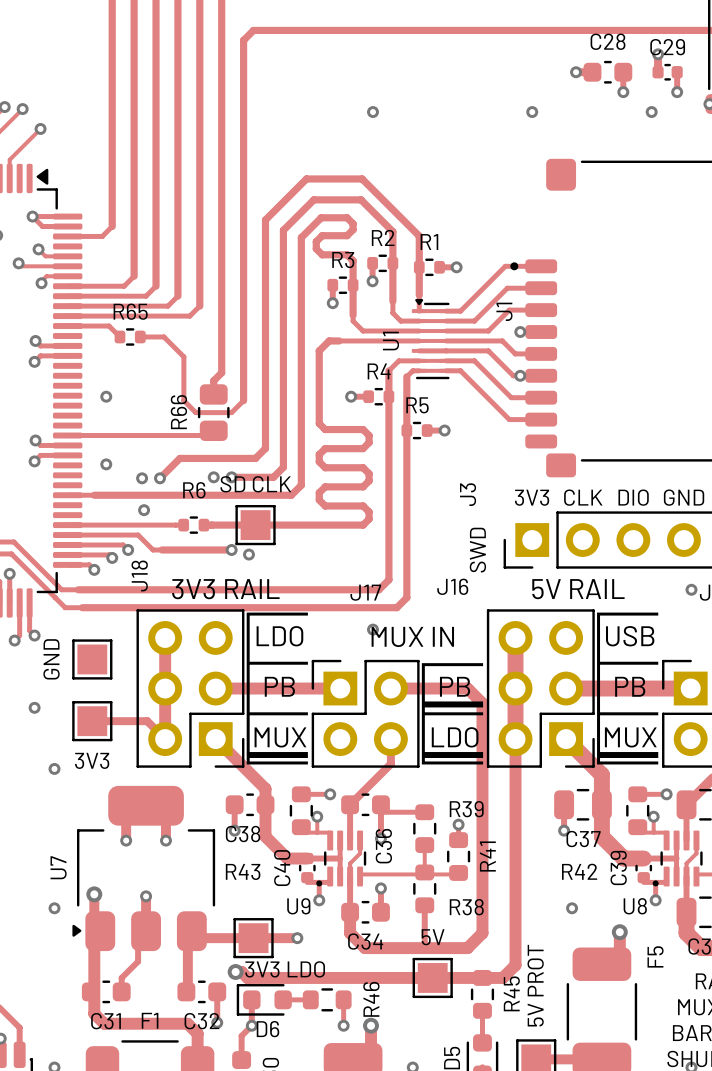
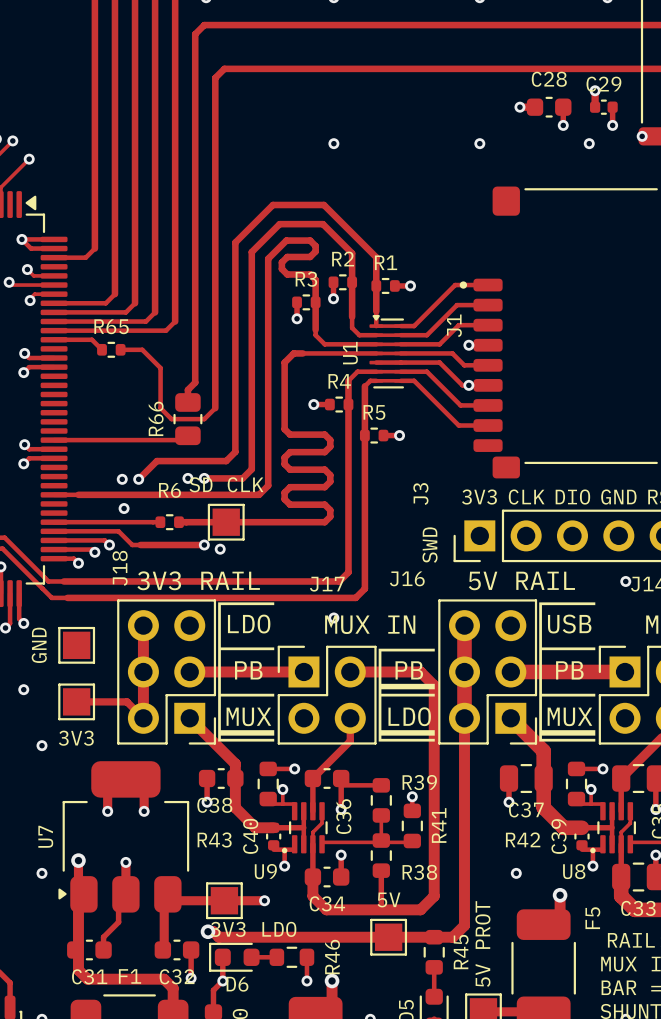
via: (106, 396) -> none
via: (106, 464) -> none

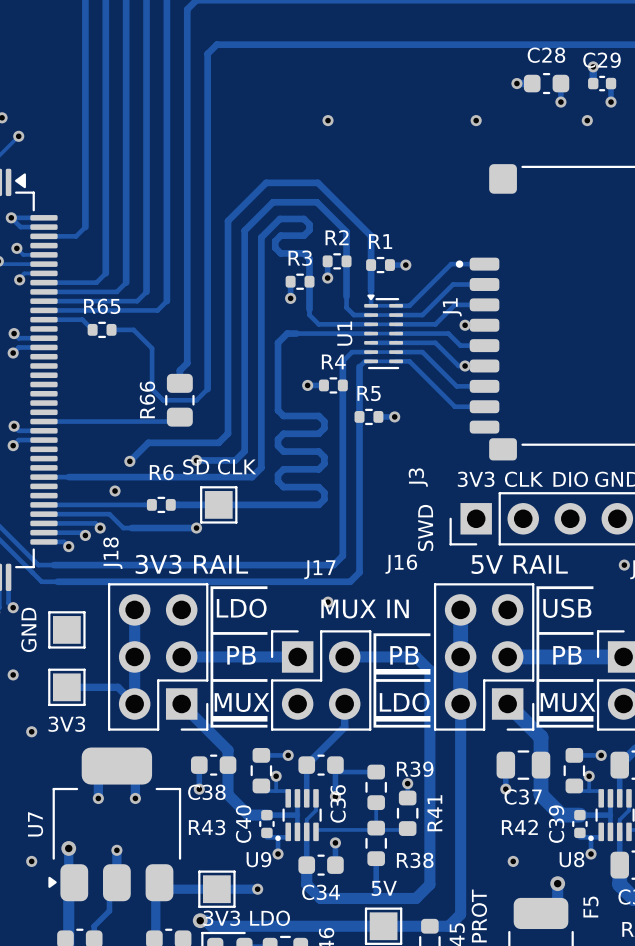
via: (187, 478) -> none
via: (122, 479) -> none
via: (220, 549) -> none

